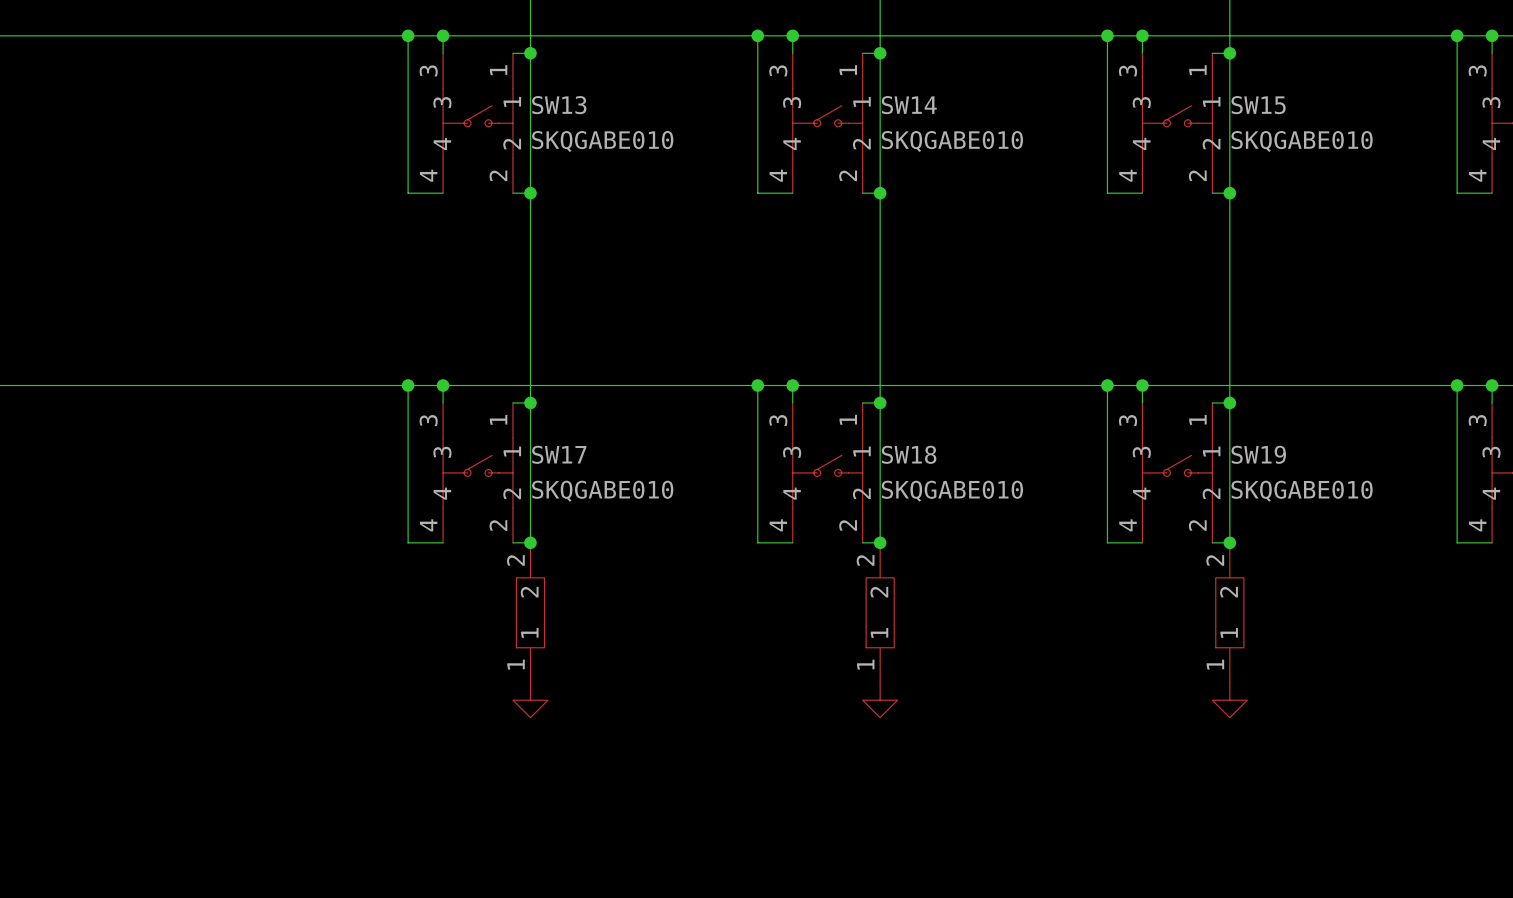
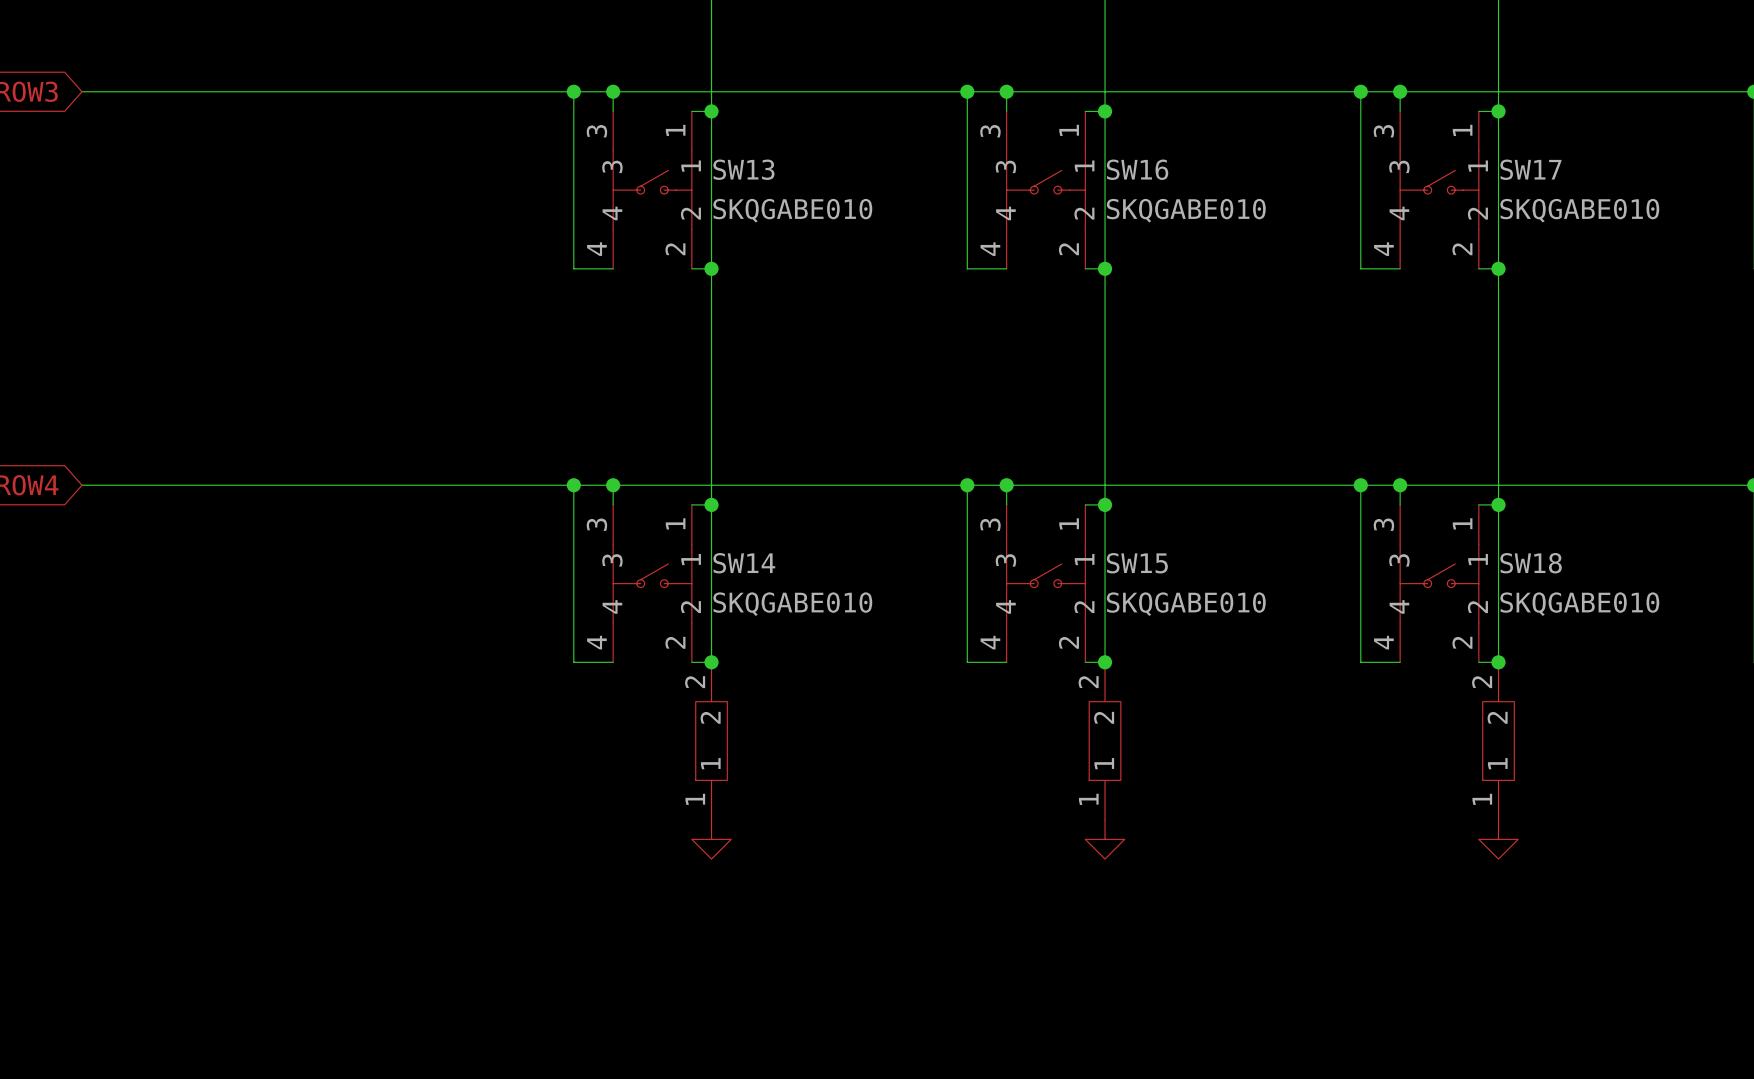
SW14 name: SW14 (909, 105) -> SW16 (1137, 169)
SW15 name: SW15 (1258, 105) -> SW17 (1530, 169)
SW17 name: SW17 (559, 454) -> SW14 (744, 563)
SW18 name: SW18 (909, 454) -> SW15 (1137, 563)
SW19 name: SW19 (1258, 454) -> SW18 (1531, 563)

